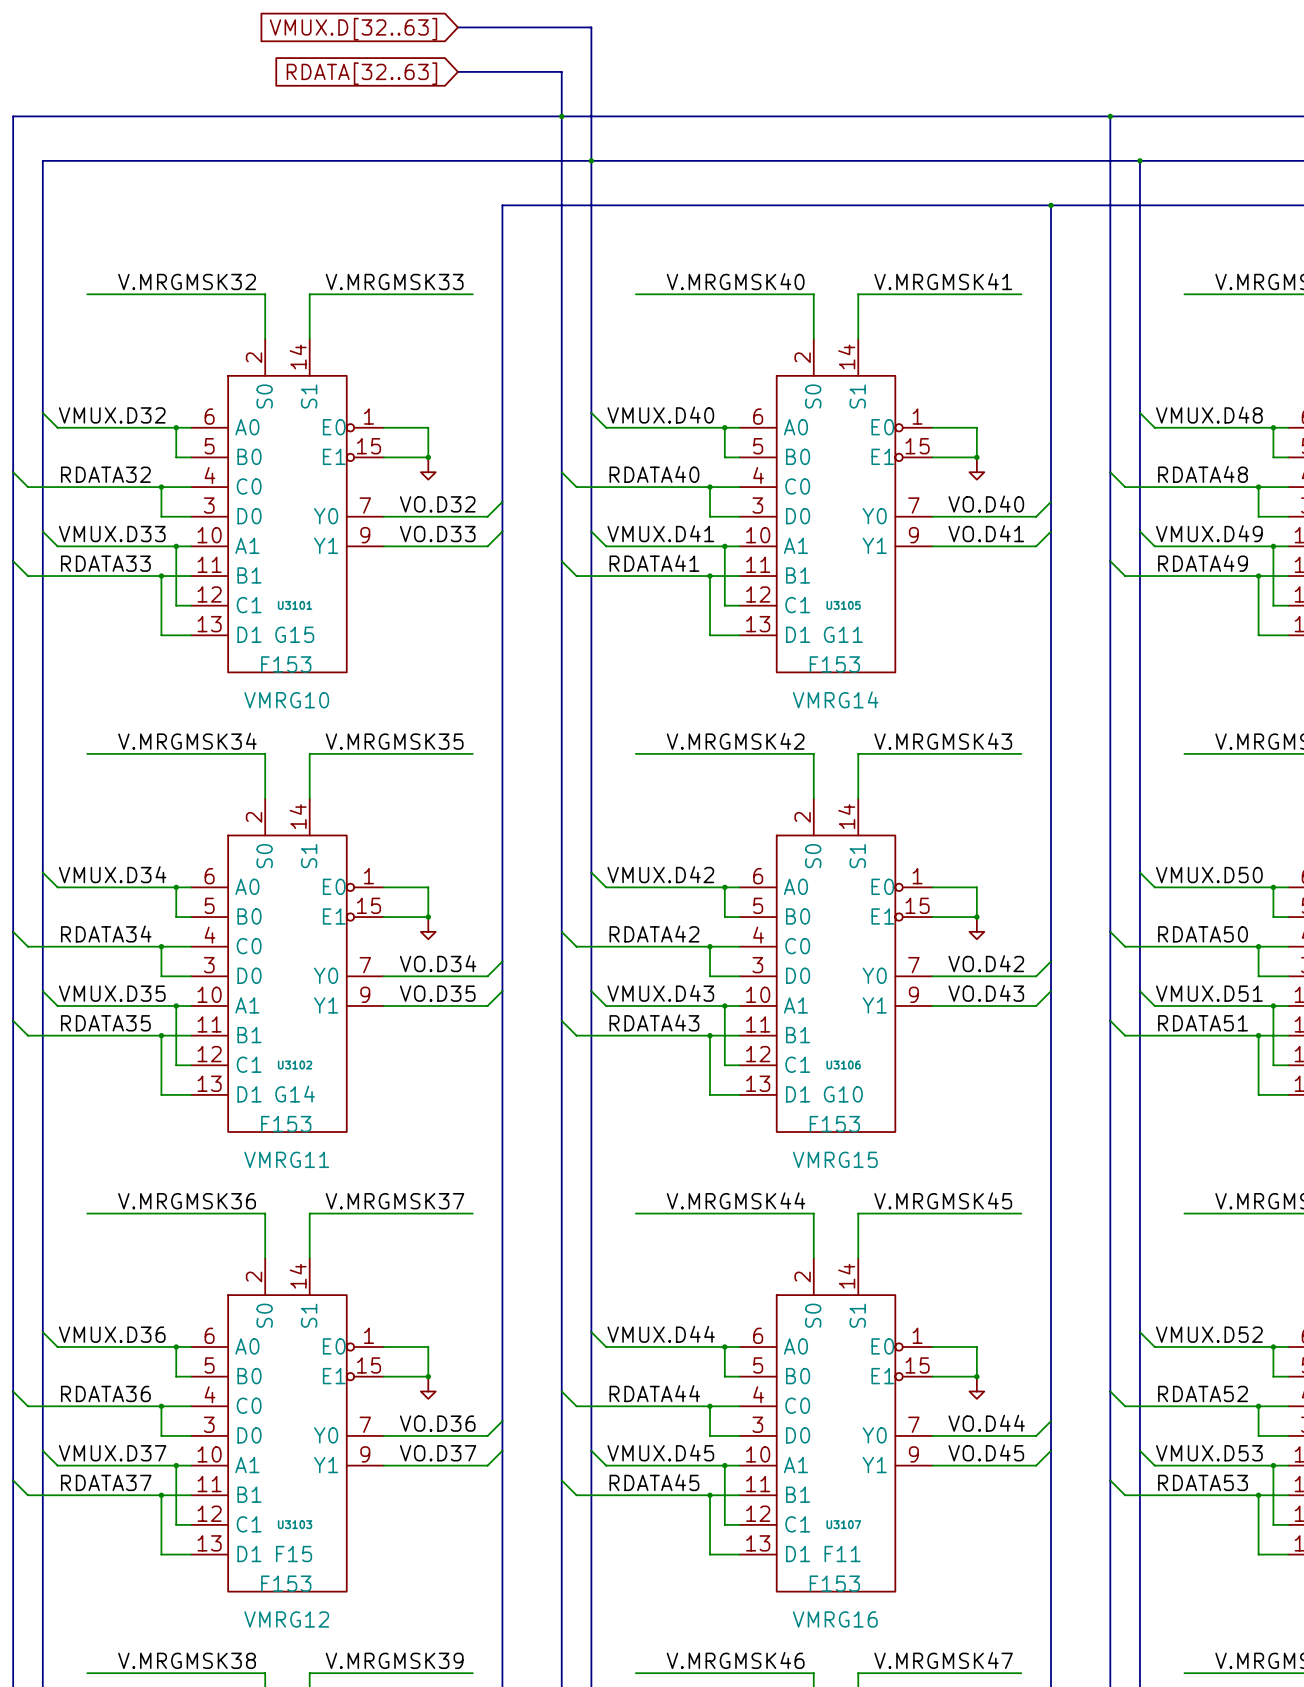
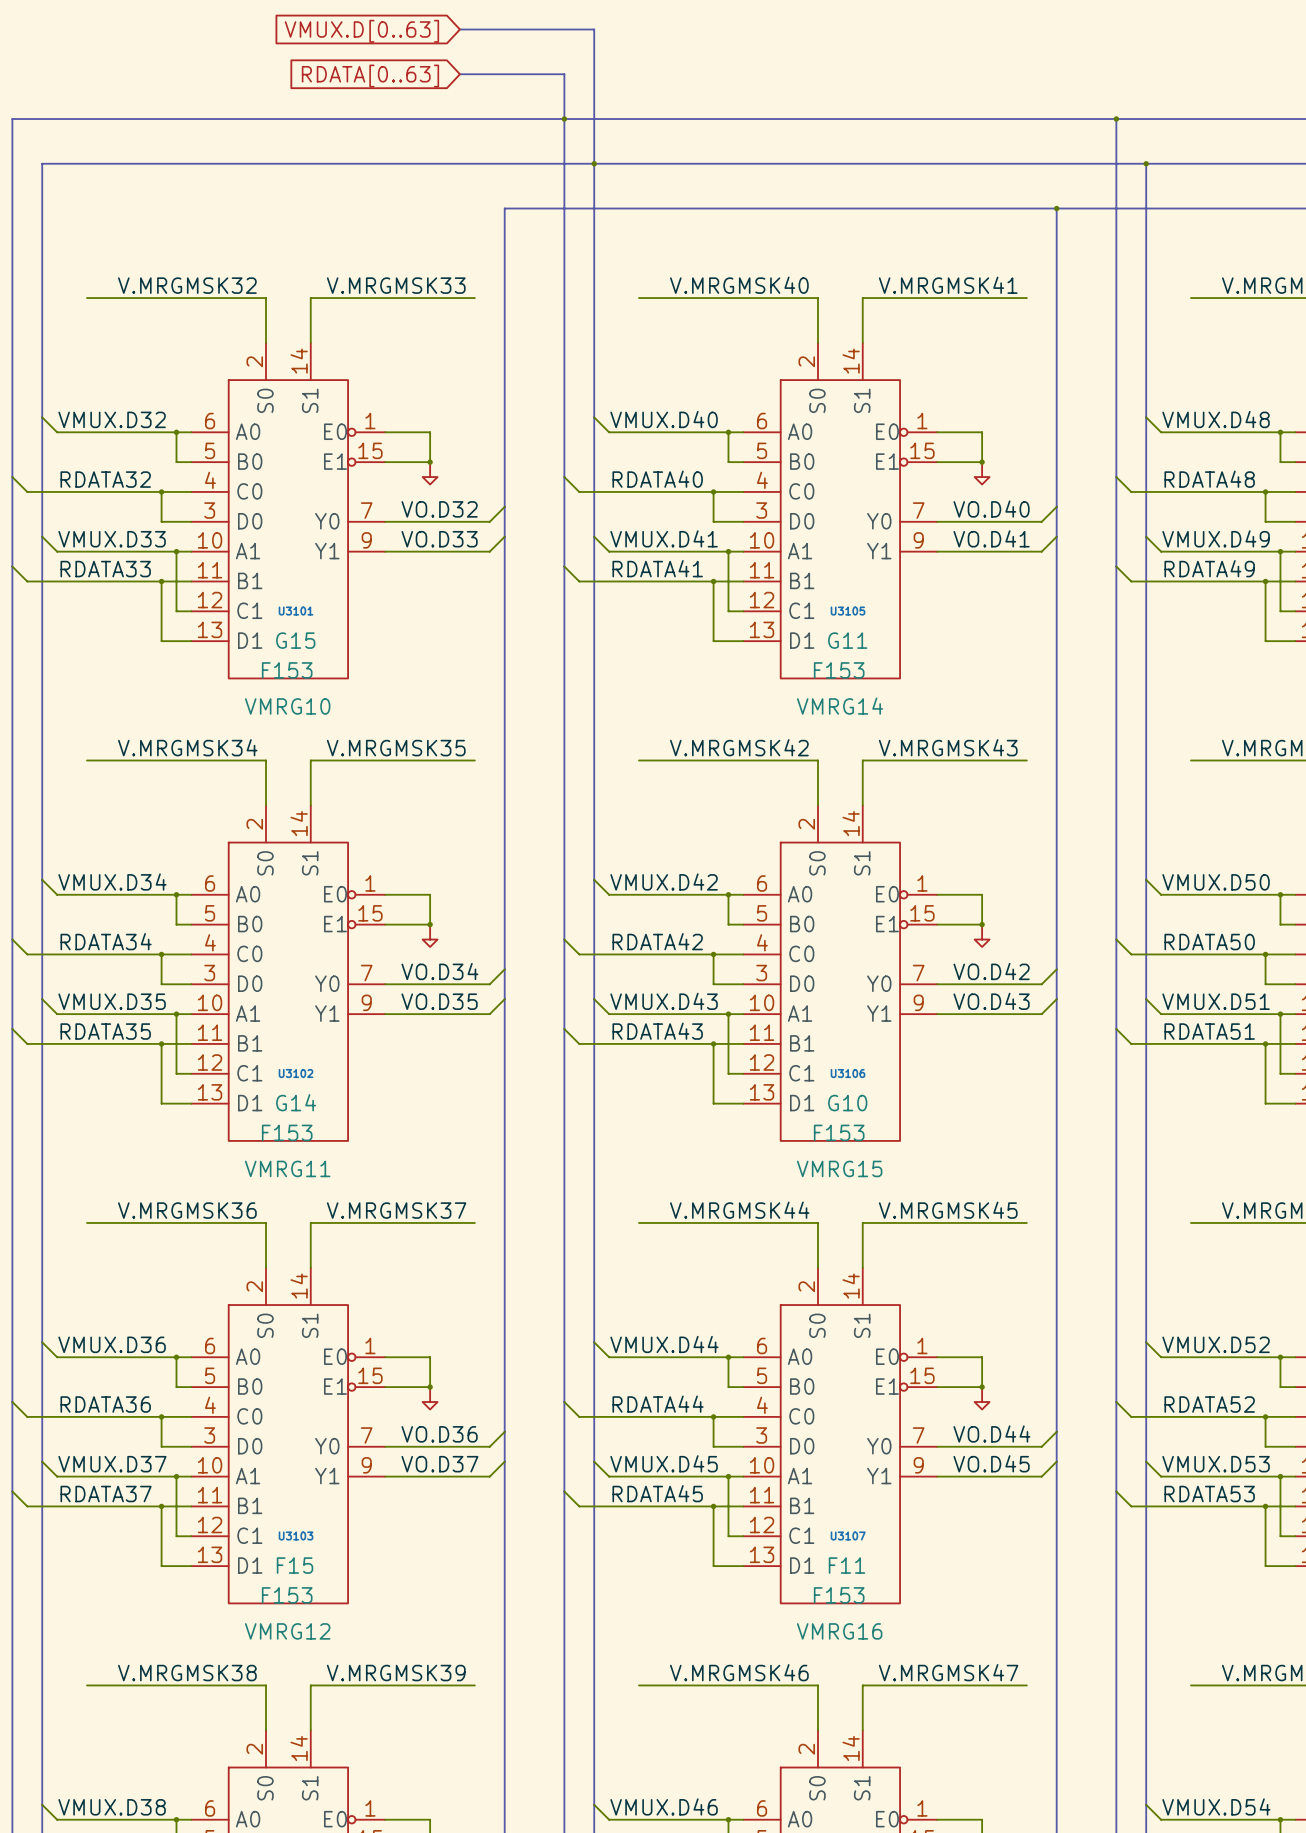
global label: VMUX.D[32..63] (353, 29) -> VMUX.D[0..63] (361, 31)
global label: RDATA[32..63] (361, 73) -> RDATA[0..63] (370, 76)

